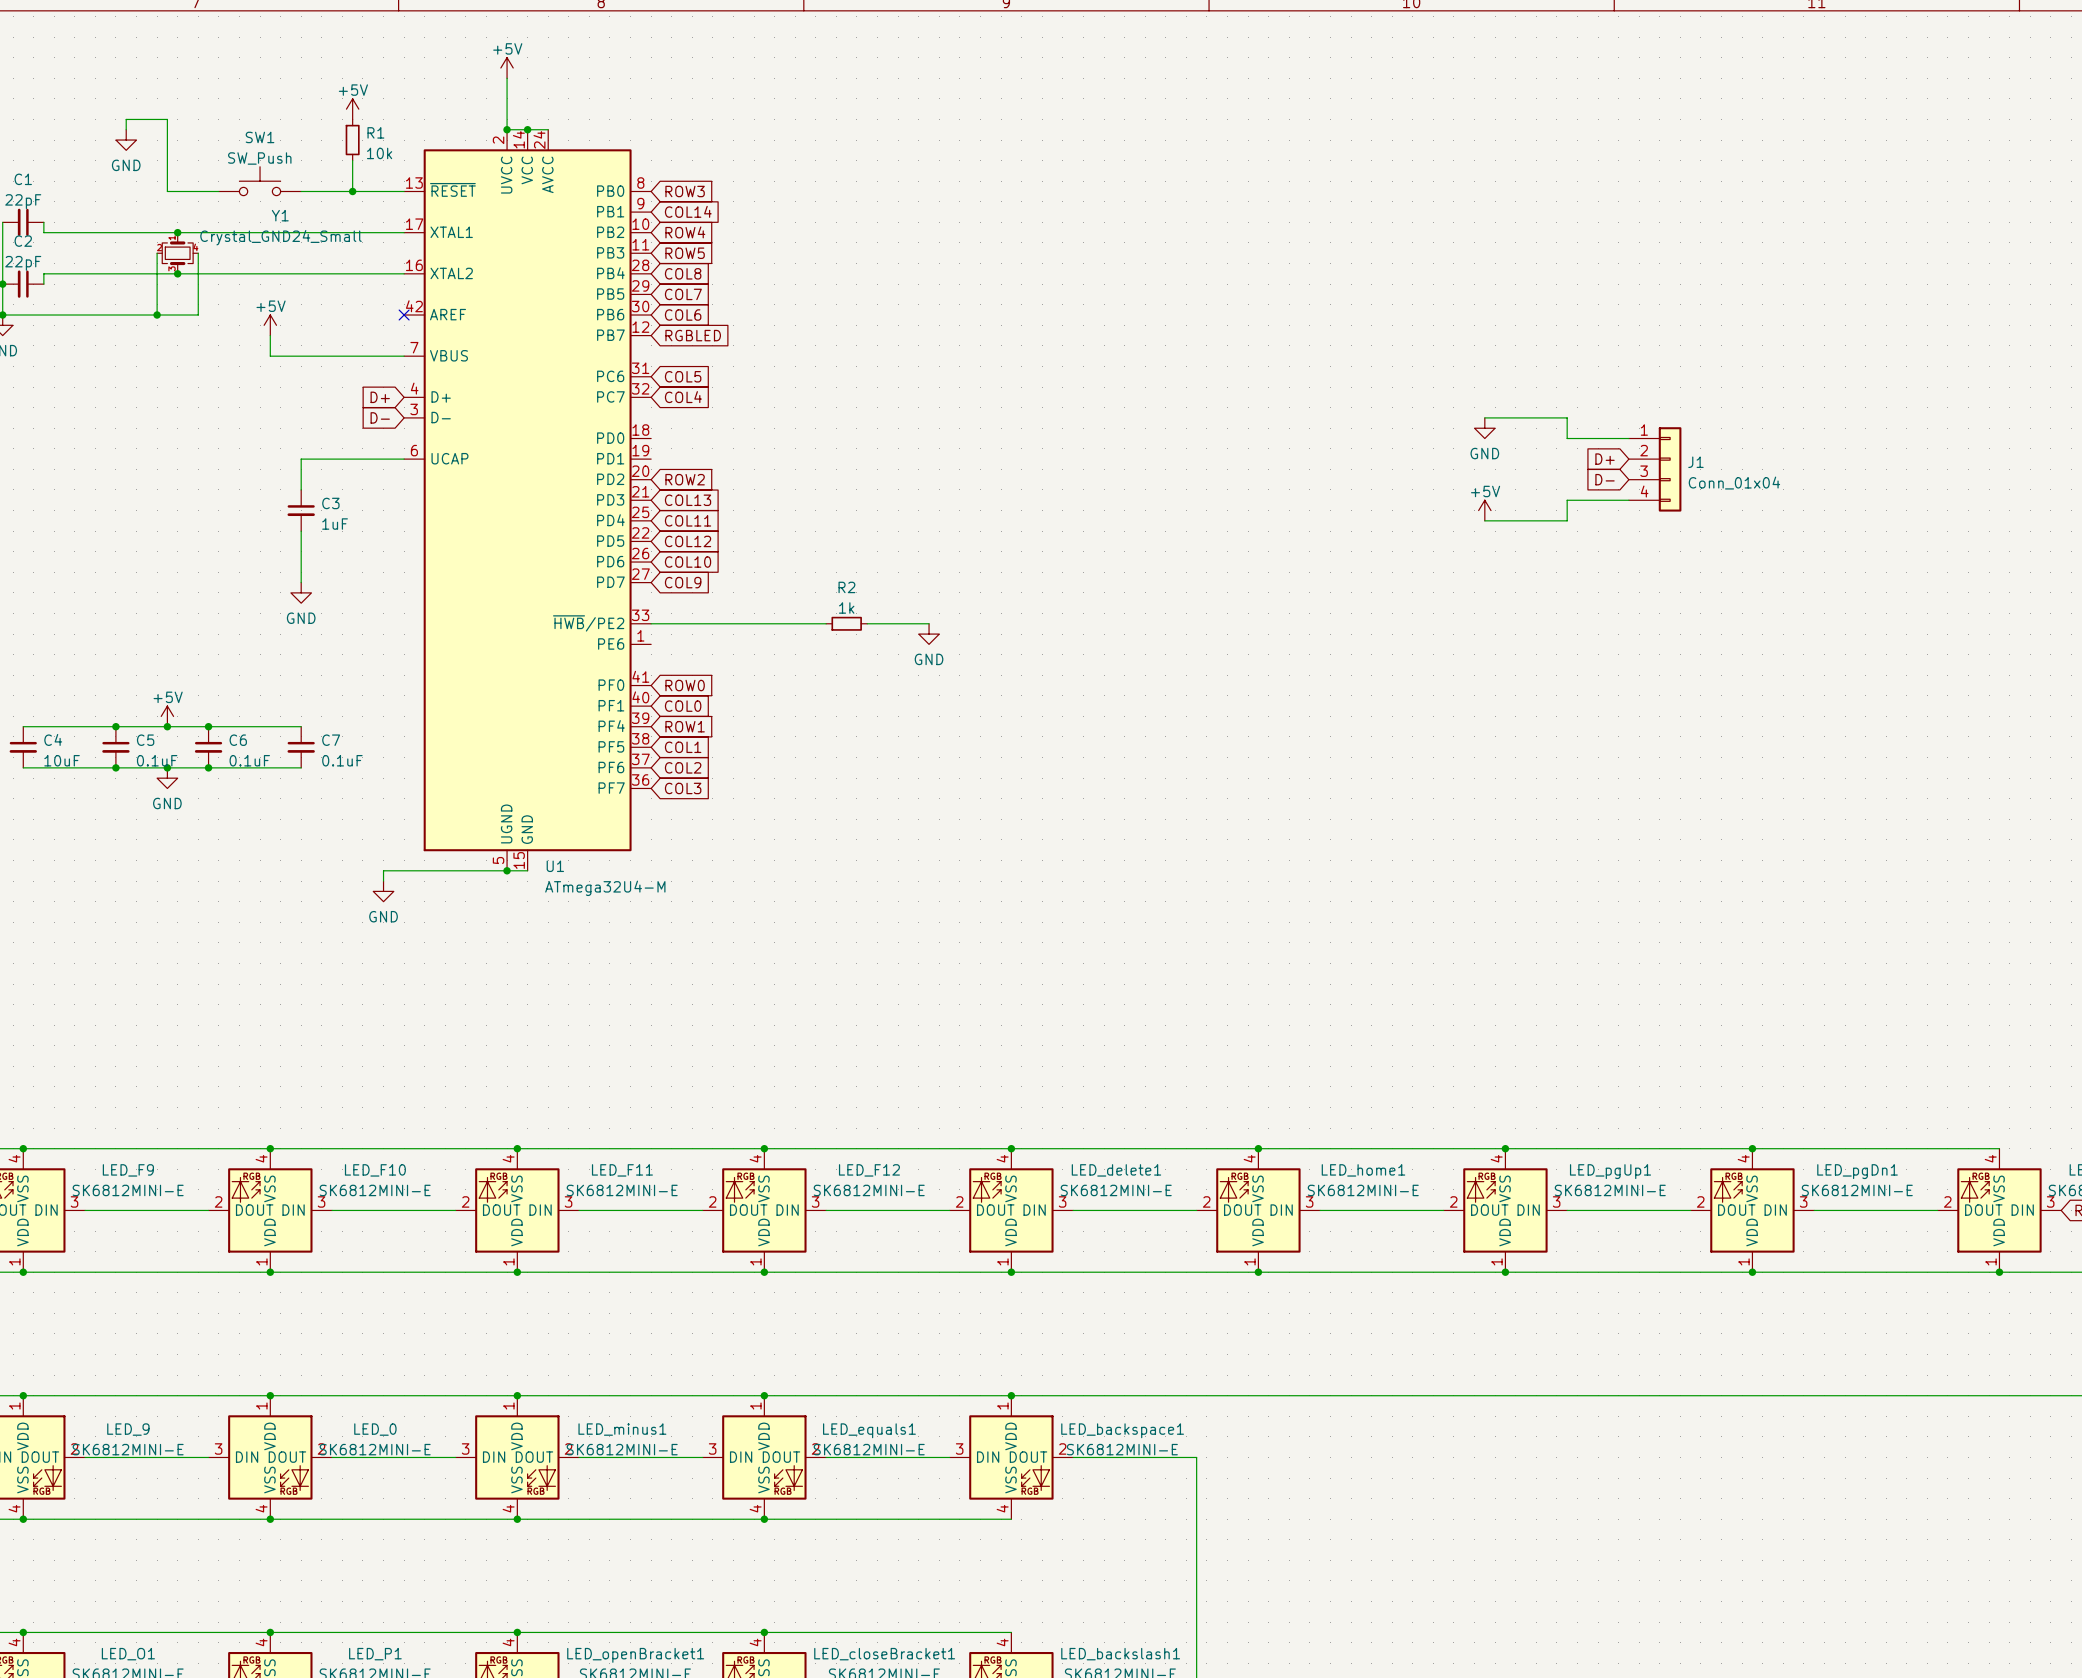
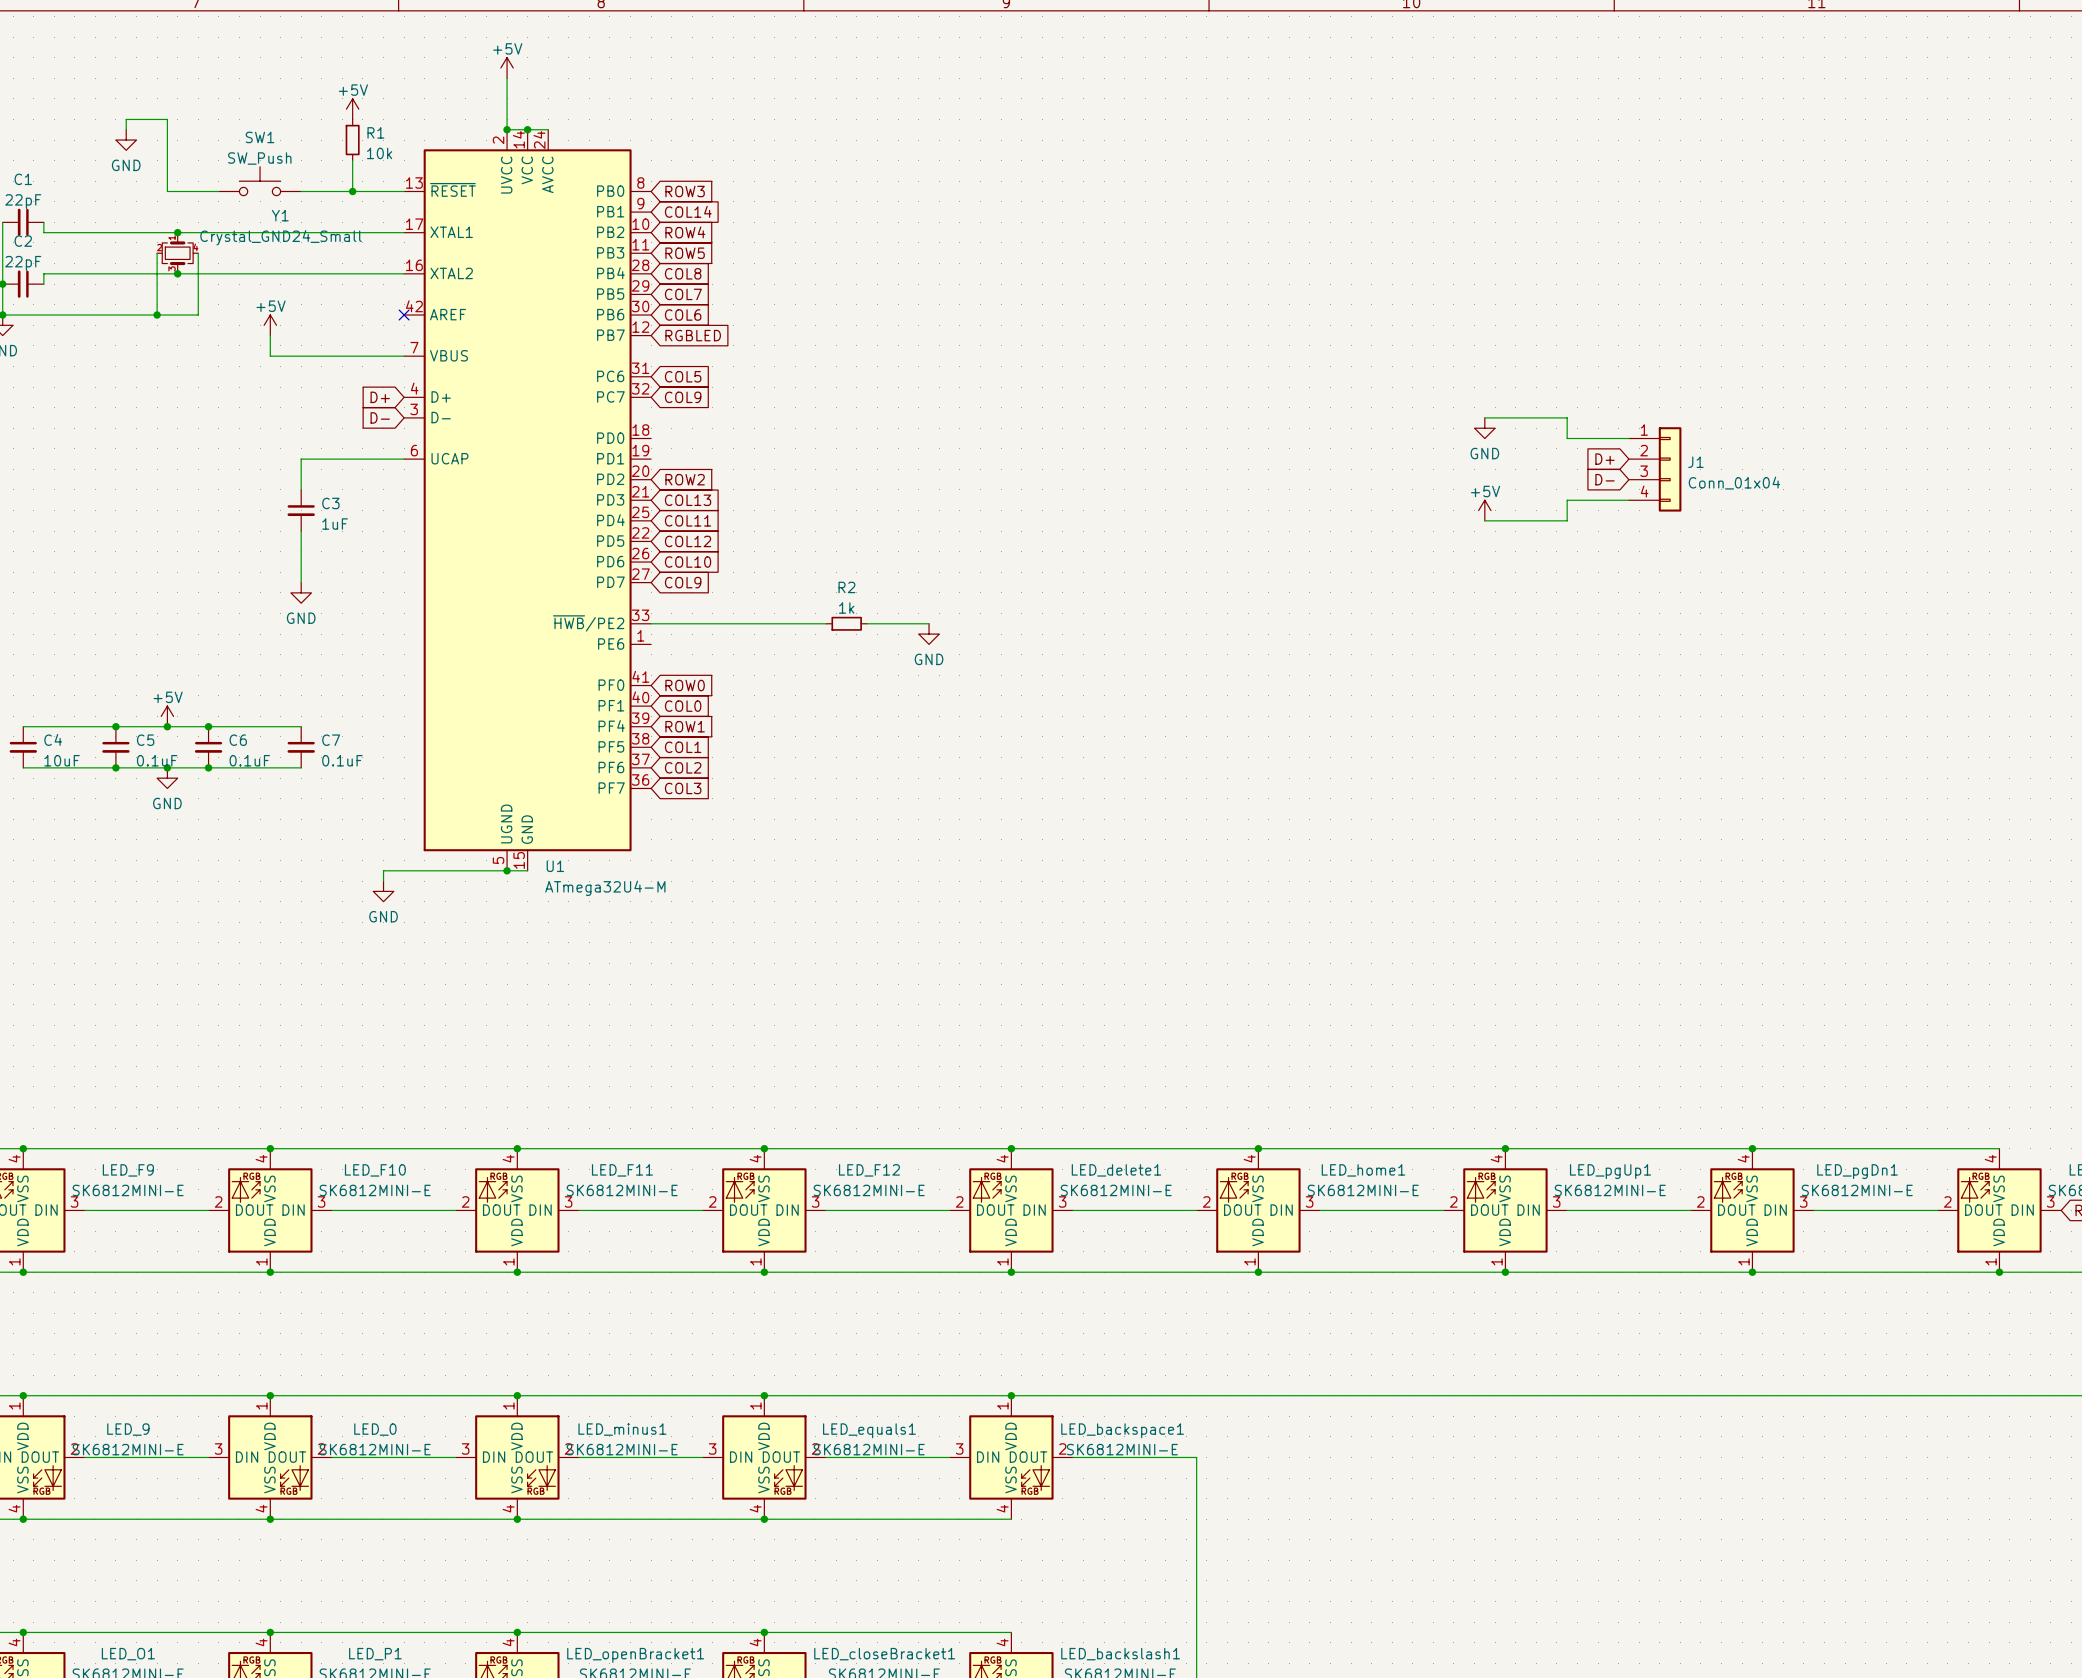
global label: COL4 (683, 397) -> COL9 (683, 397)

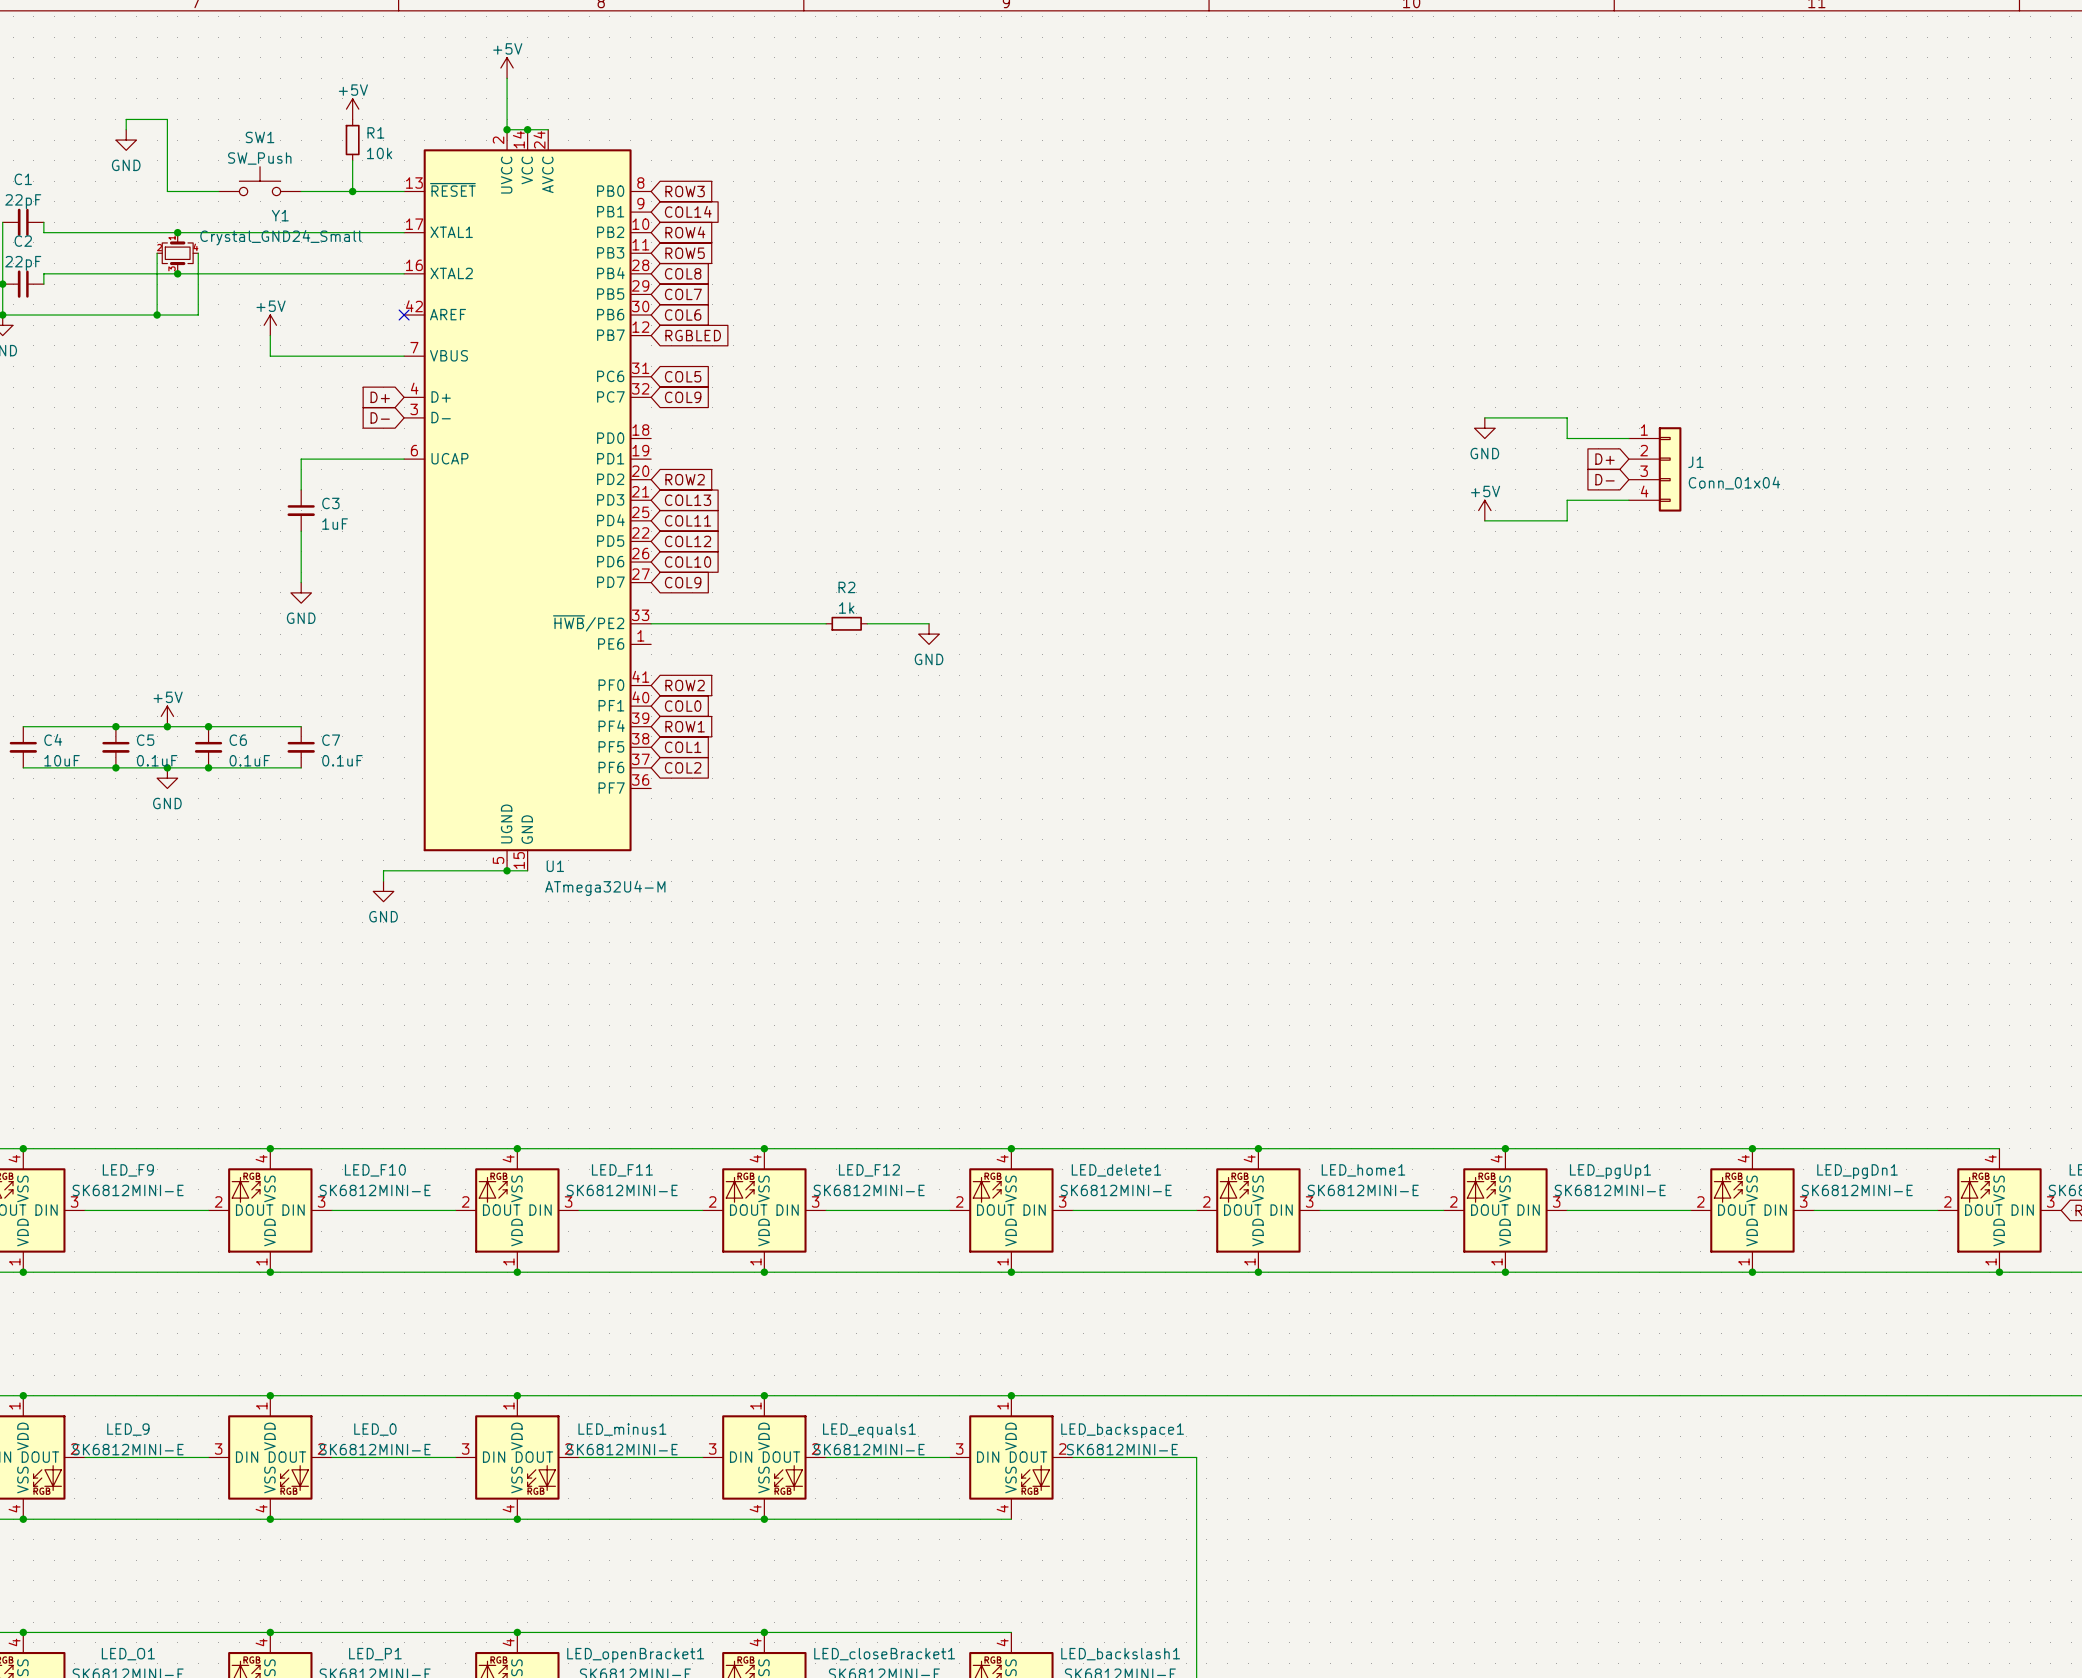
global label: ROW0 (685, 685) -> ROW2 (685, 685)
global label: COL3 (683, 788) -> none

